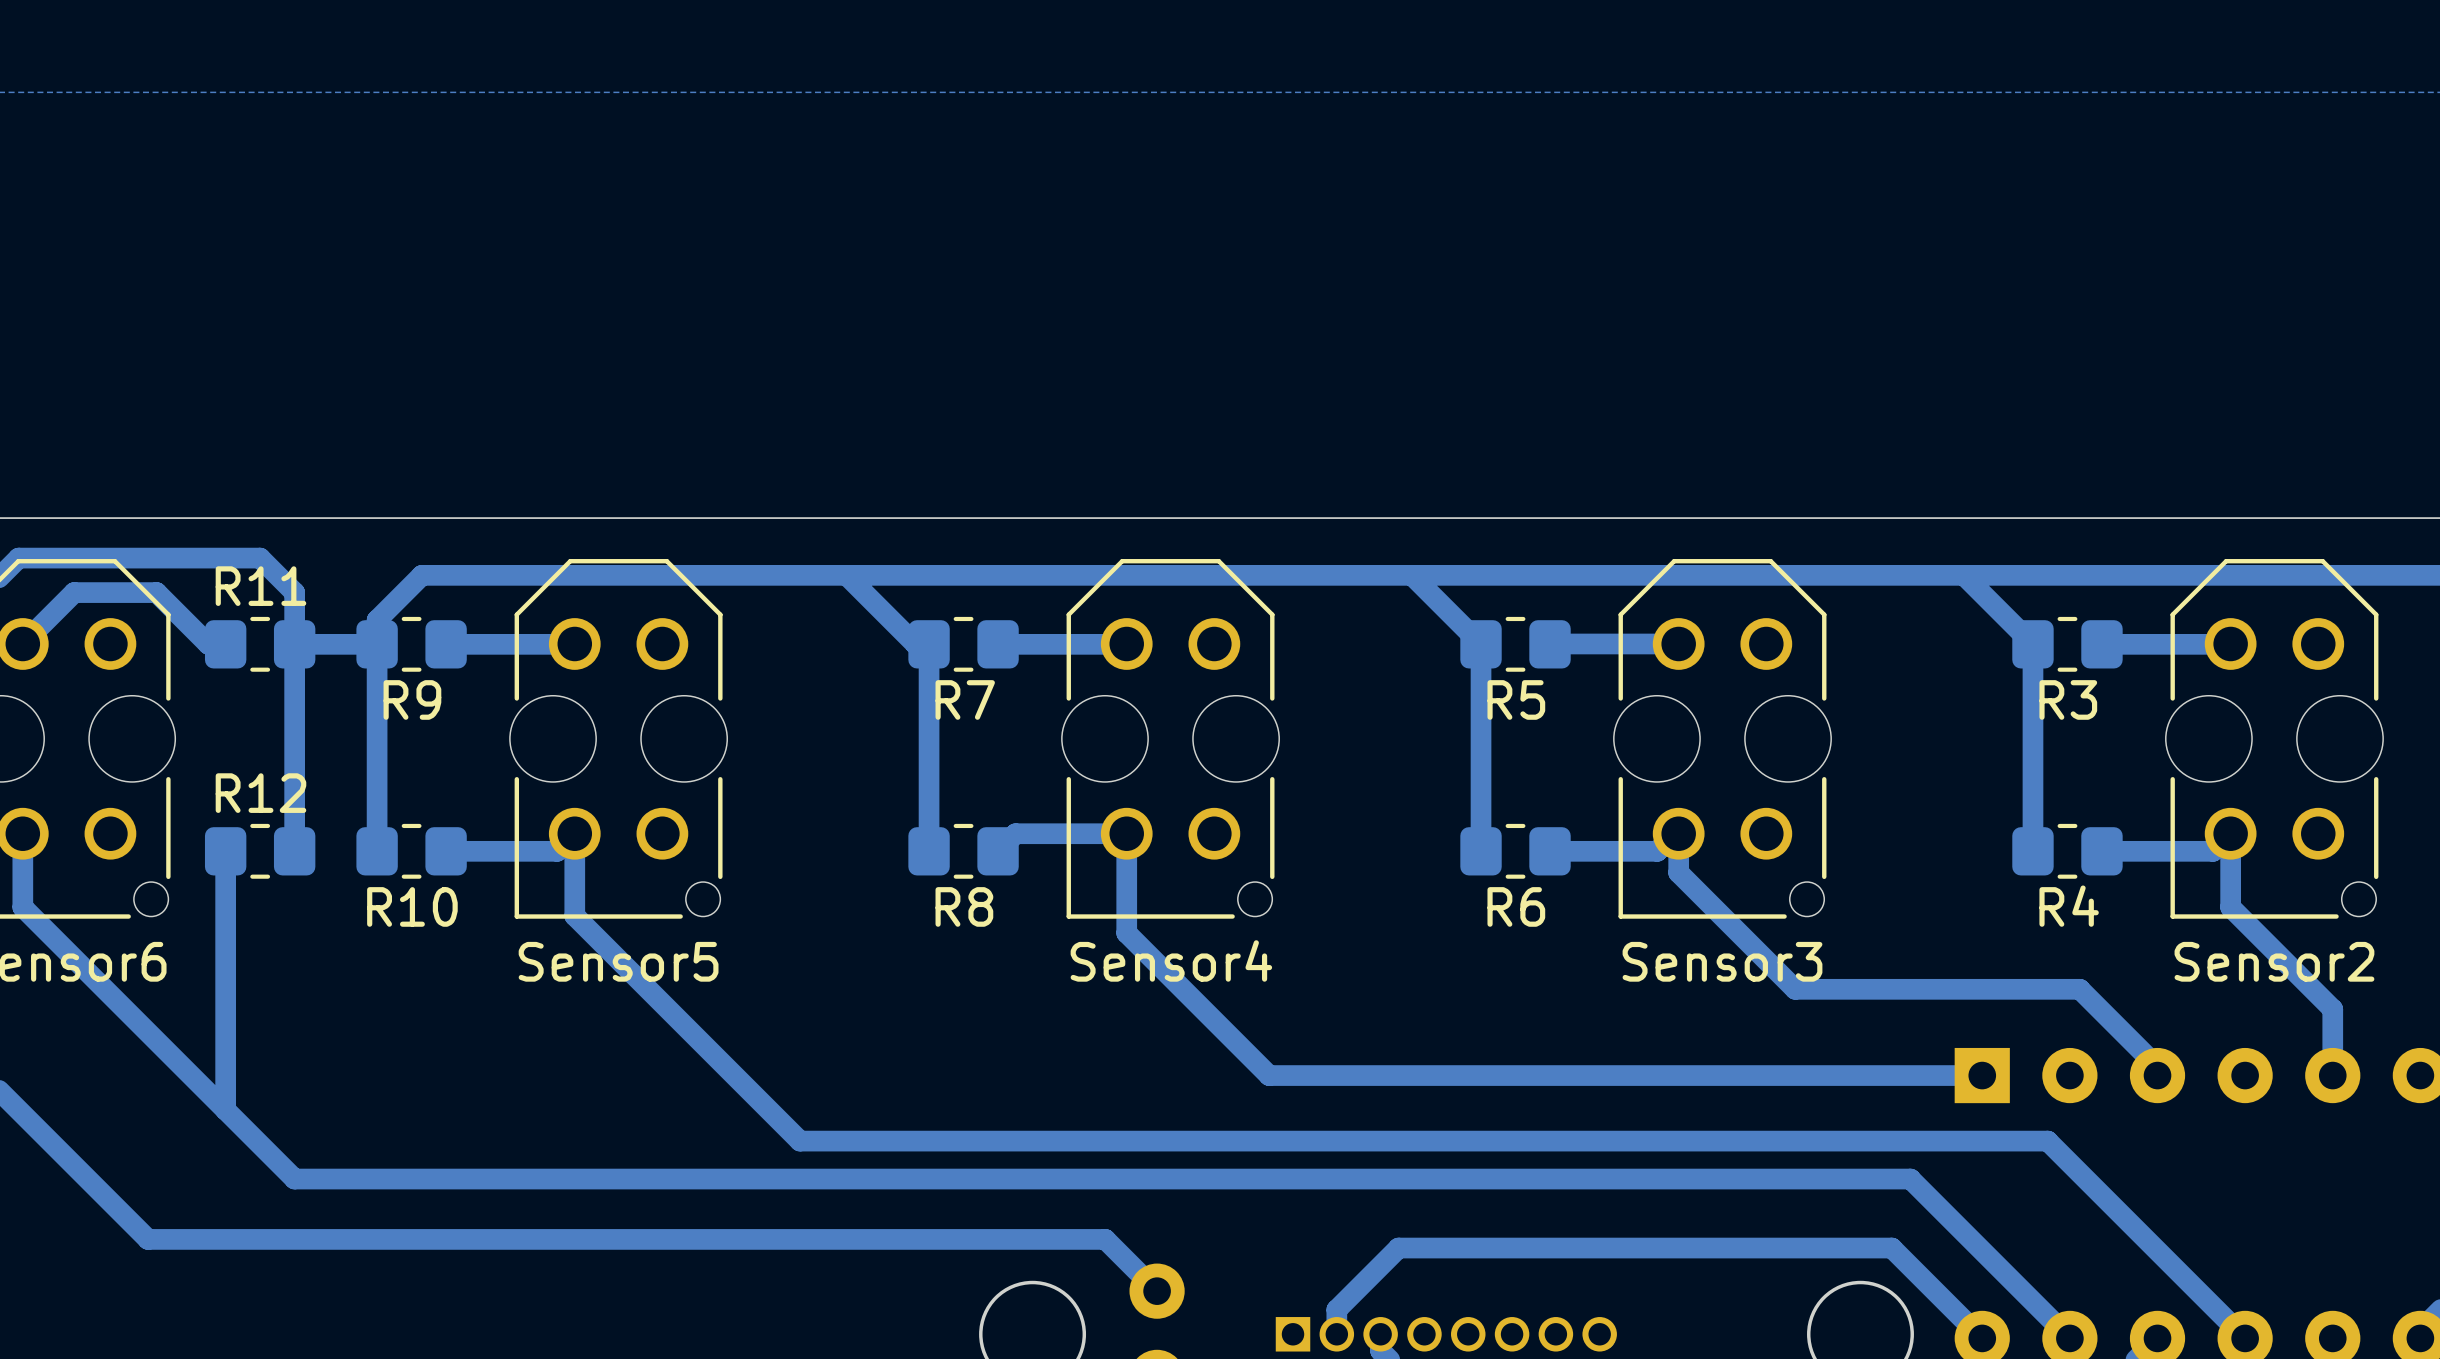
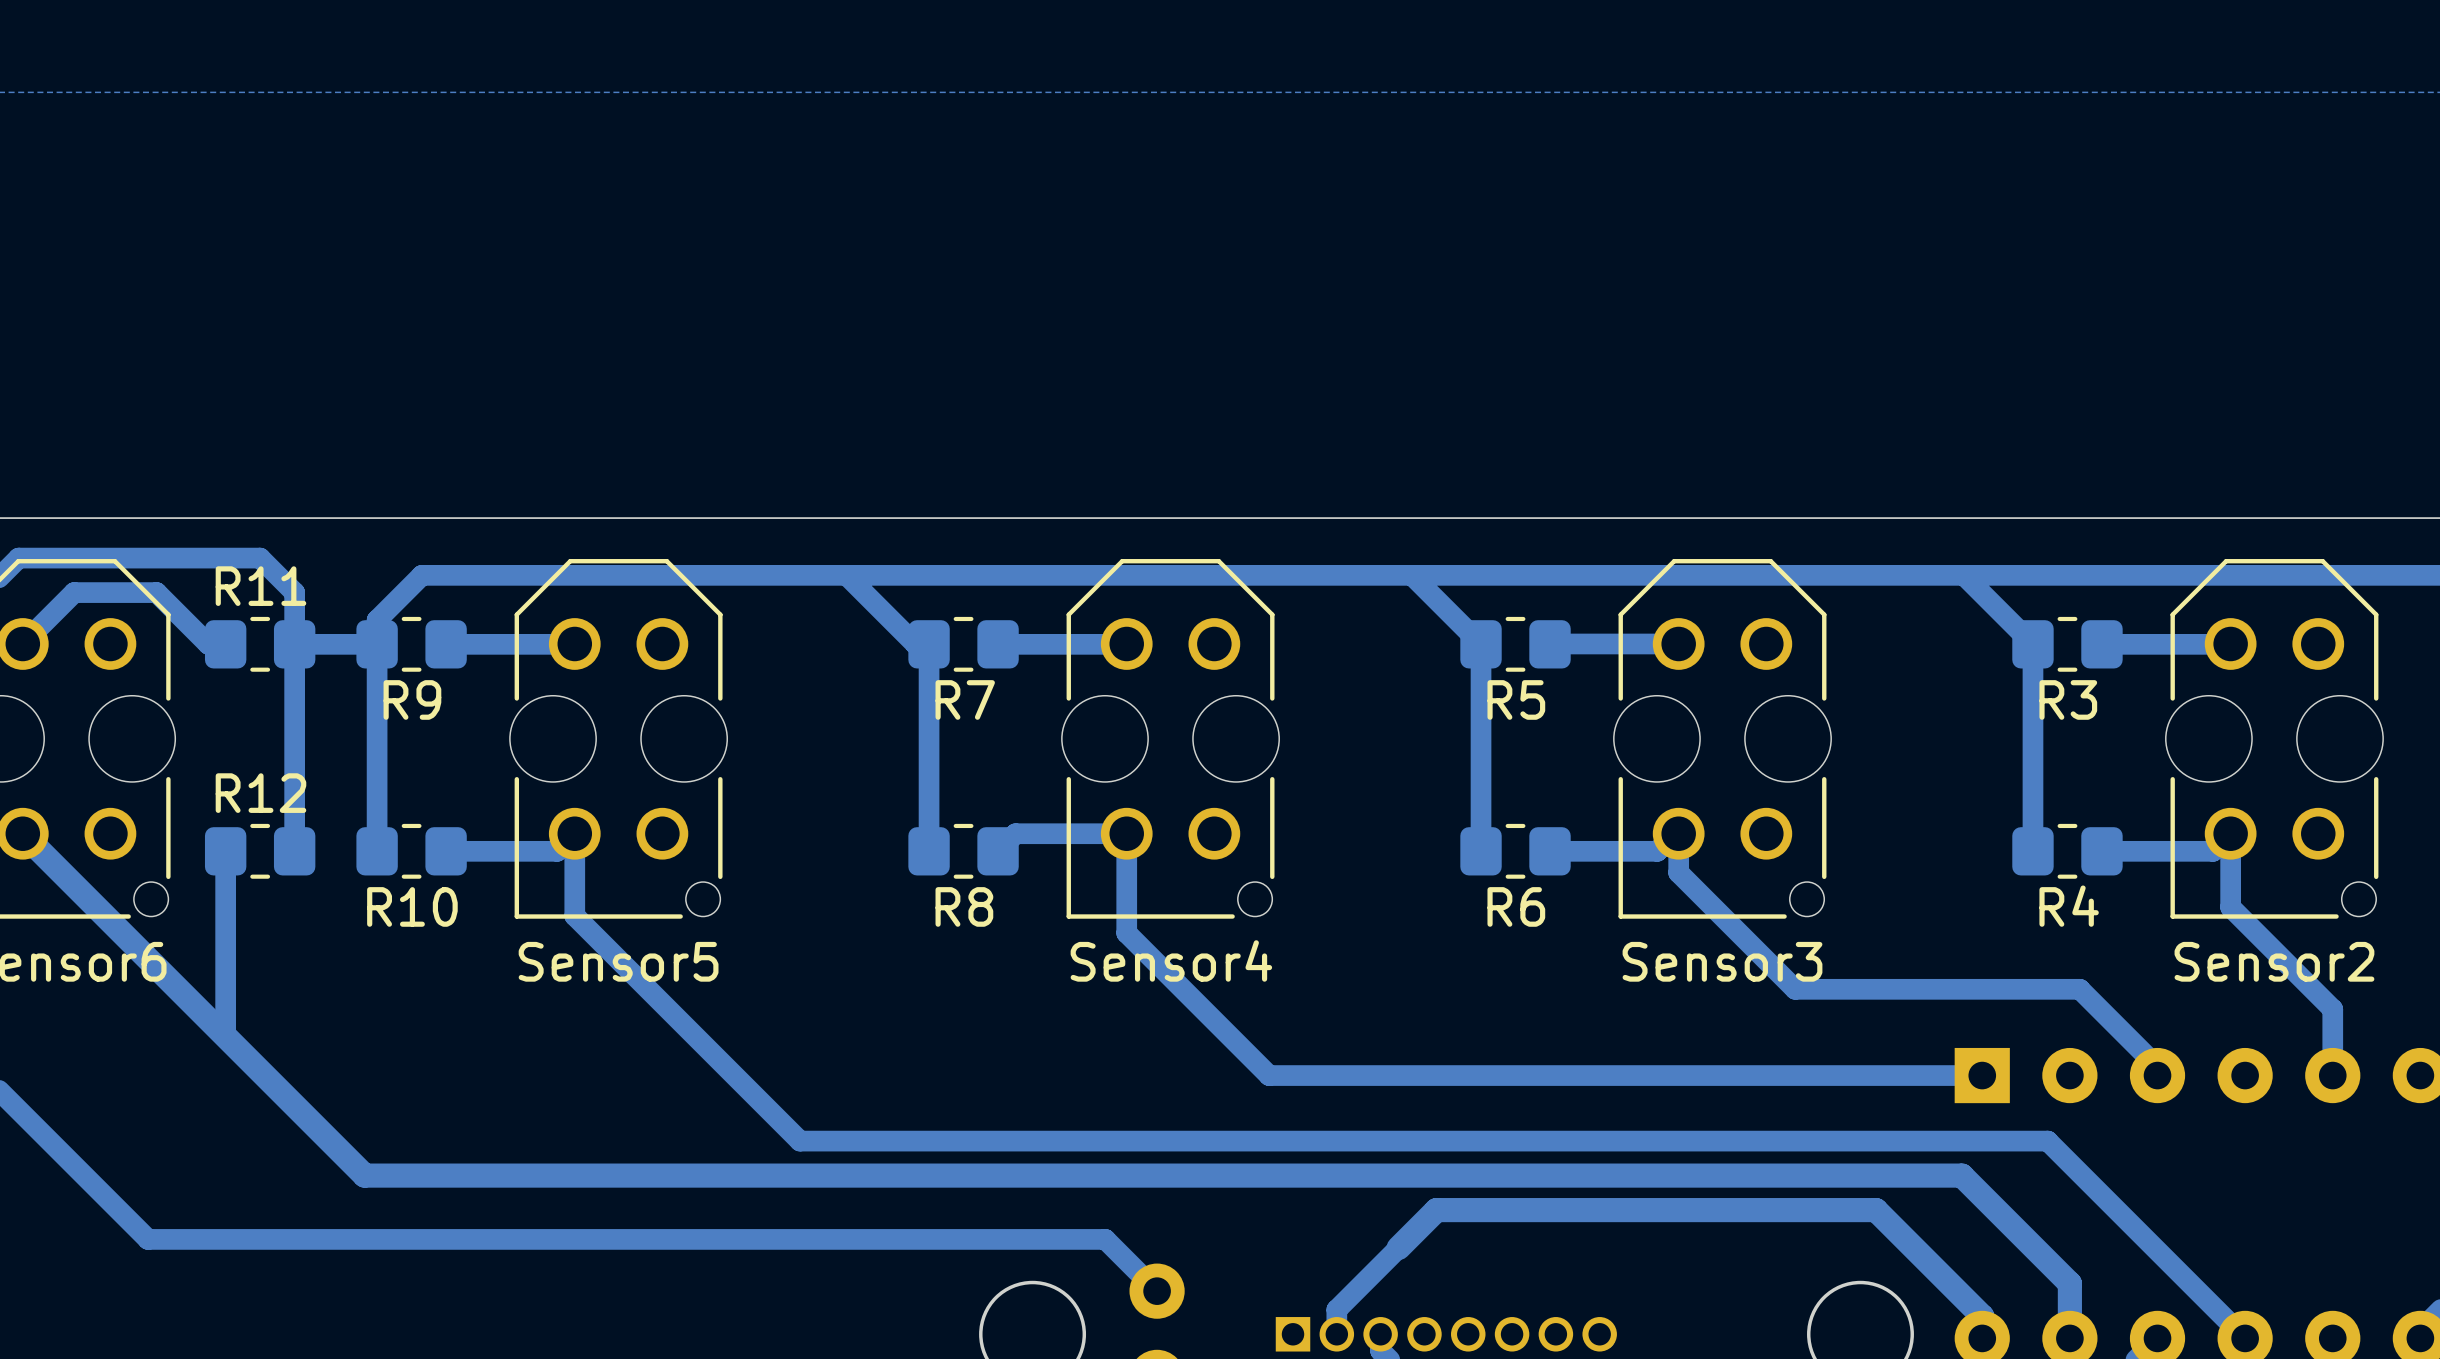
track: (22, 833) (22, 907) (294, 1179) (1910, 1179) (2069, 1338) -> (22, 833) (364, 1175) (1961, 1175) (2069, 1283) (2069, 1338)
track: (225, 1036) (225, 1110) -> none
track: (1398, 1248) (1891, 1248) (1982, 1338) -> (1398, 1248) (1436, 1210) (1876, 1210) (1982, 1316) (1982, 1338)

